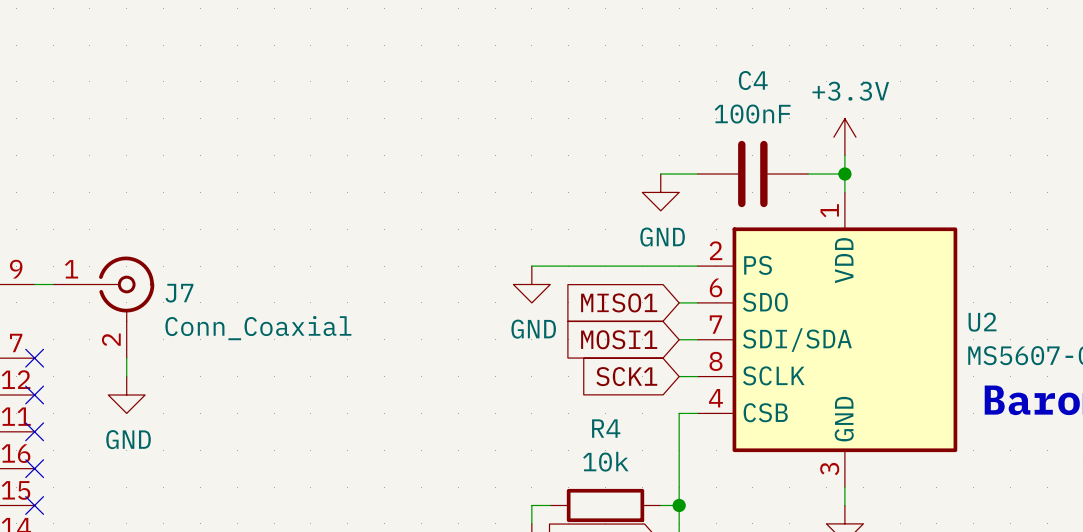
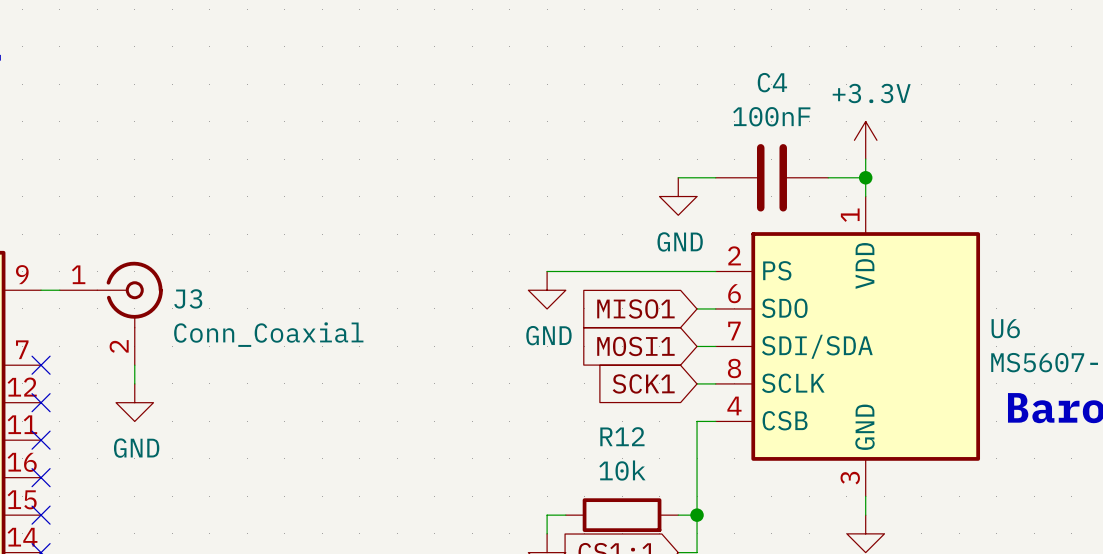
J7 name: J7 (179, 293) -> J3 (188, 298)
U2 name: U2 (982, 322) -> U6 (1005, 328)
R4 name: R4 (606, 428) -> R12 (622, 436)

